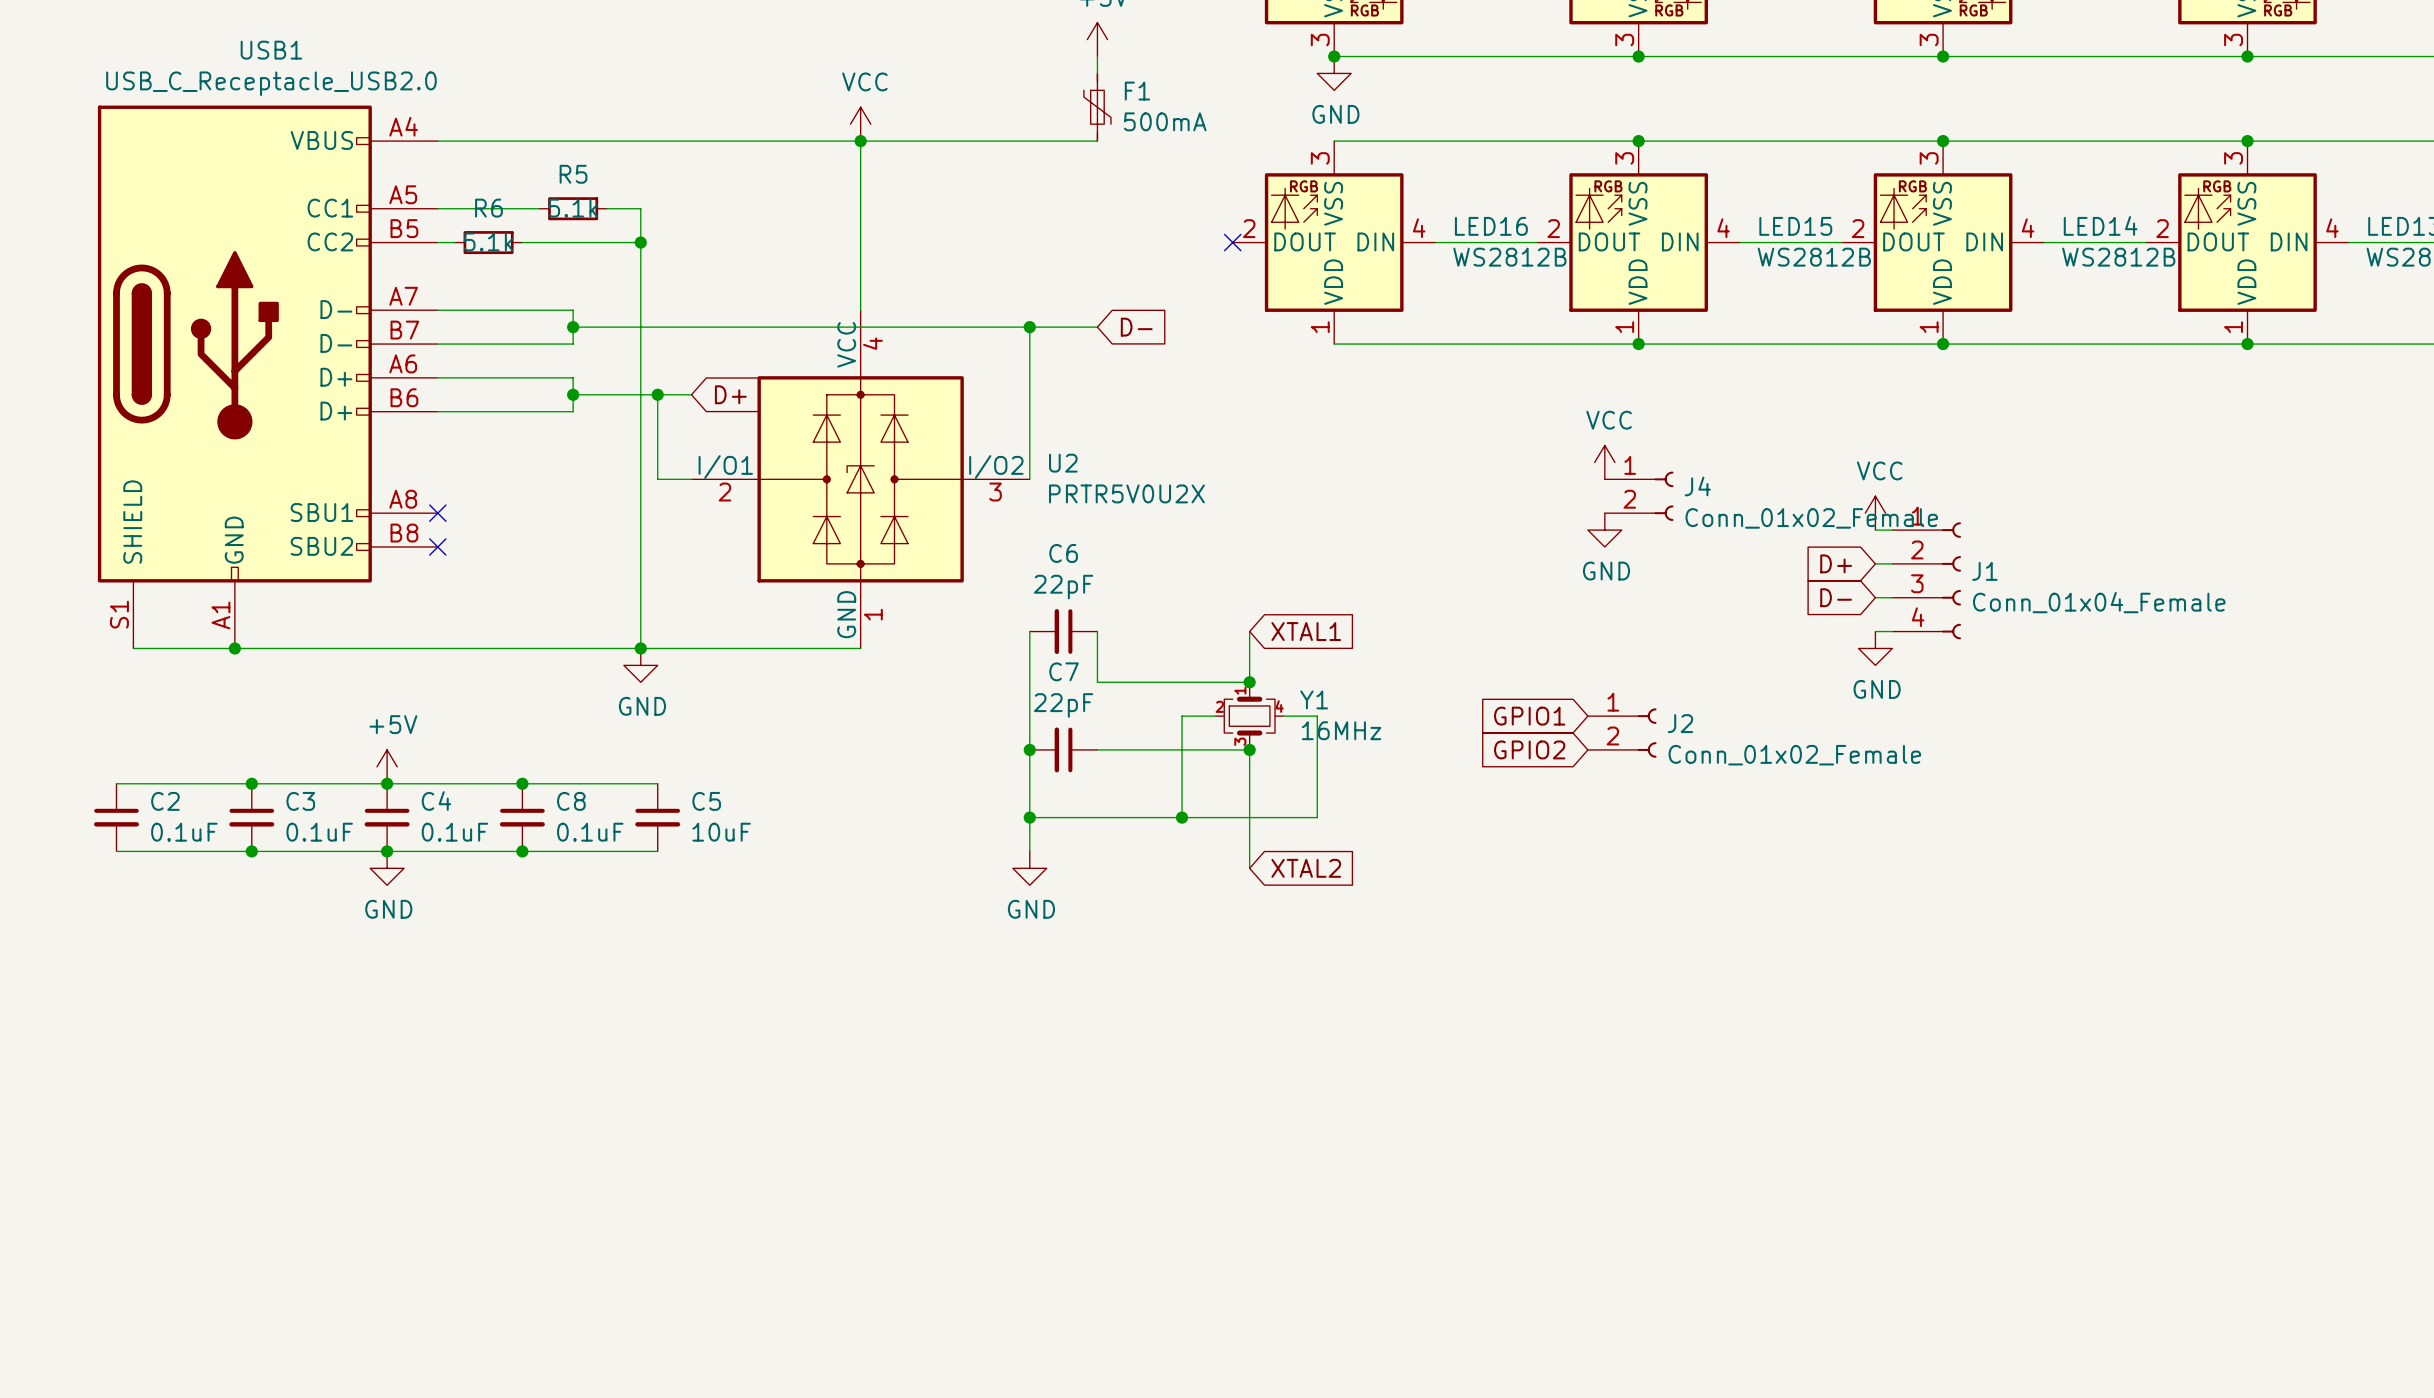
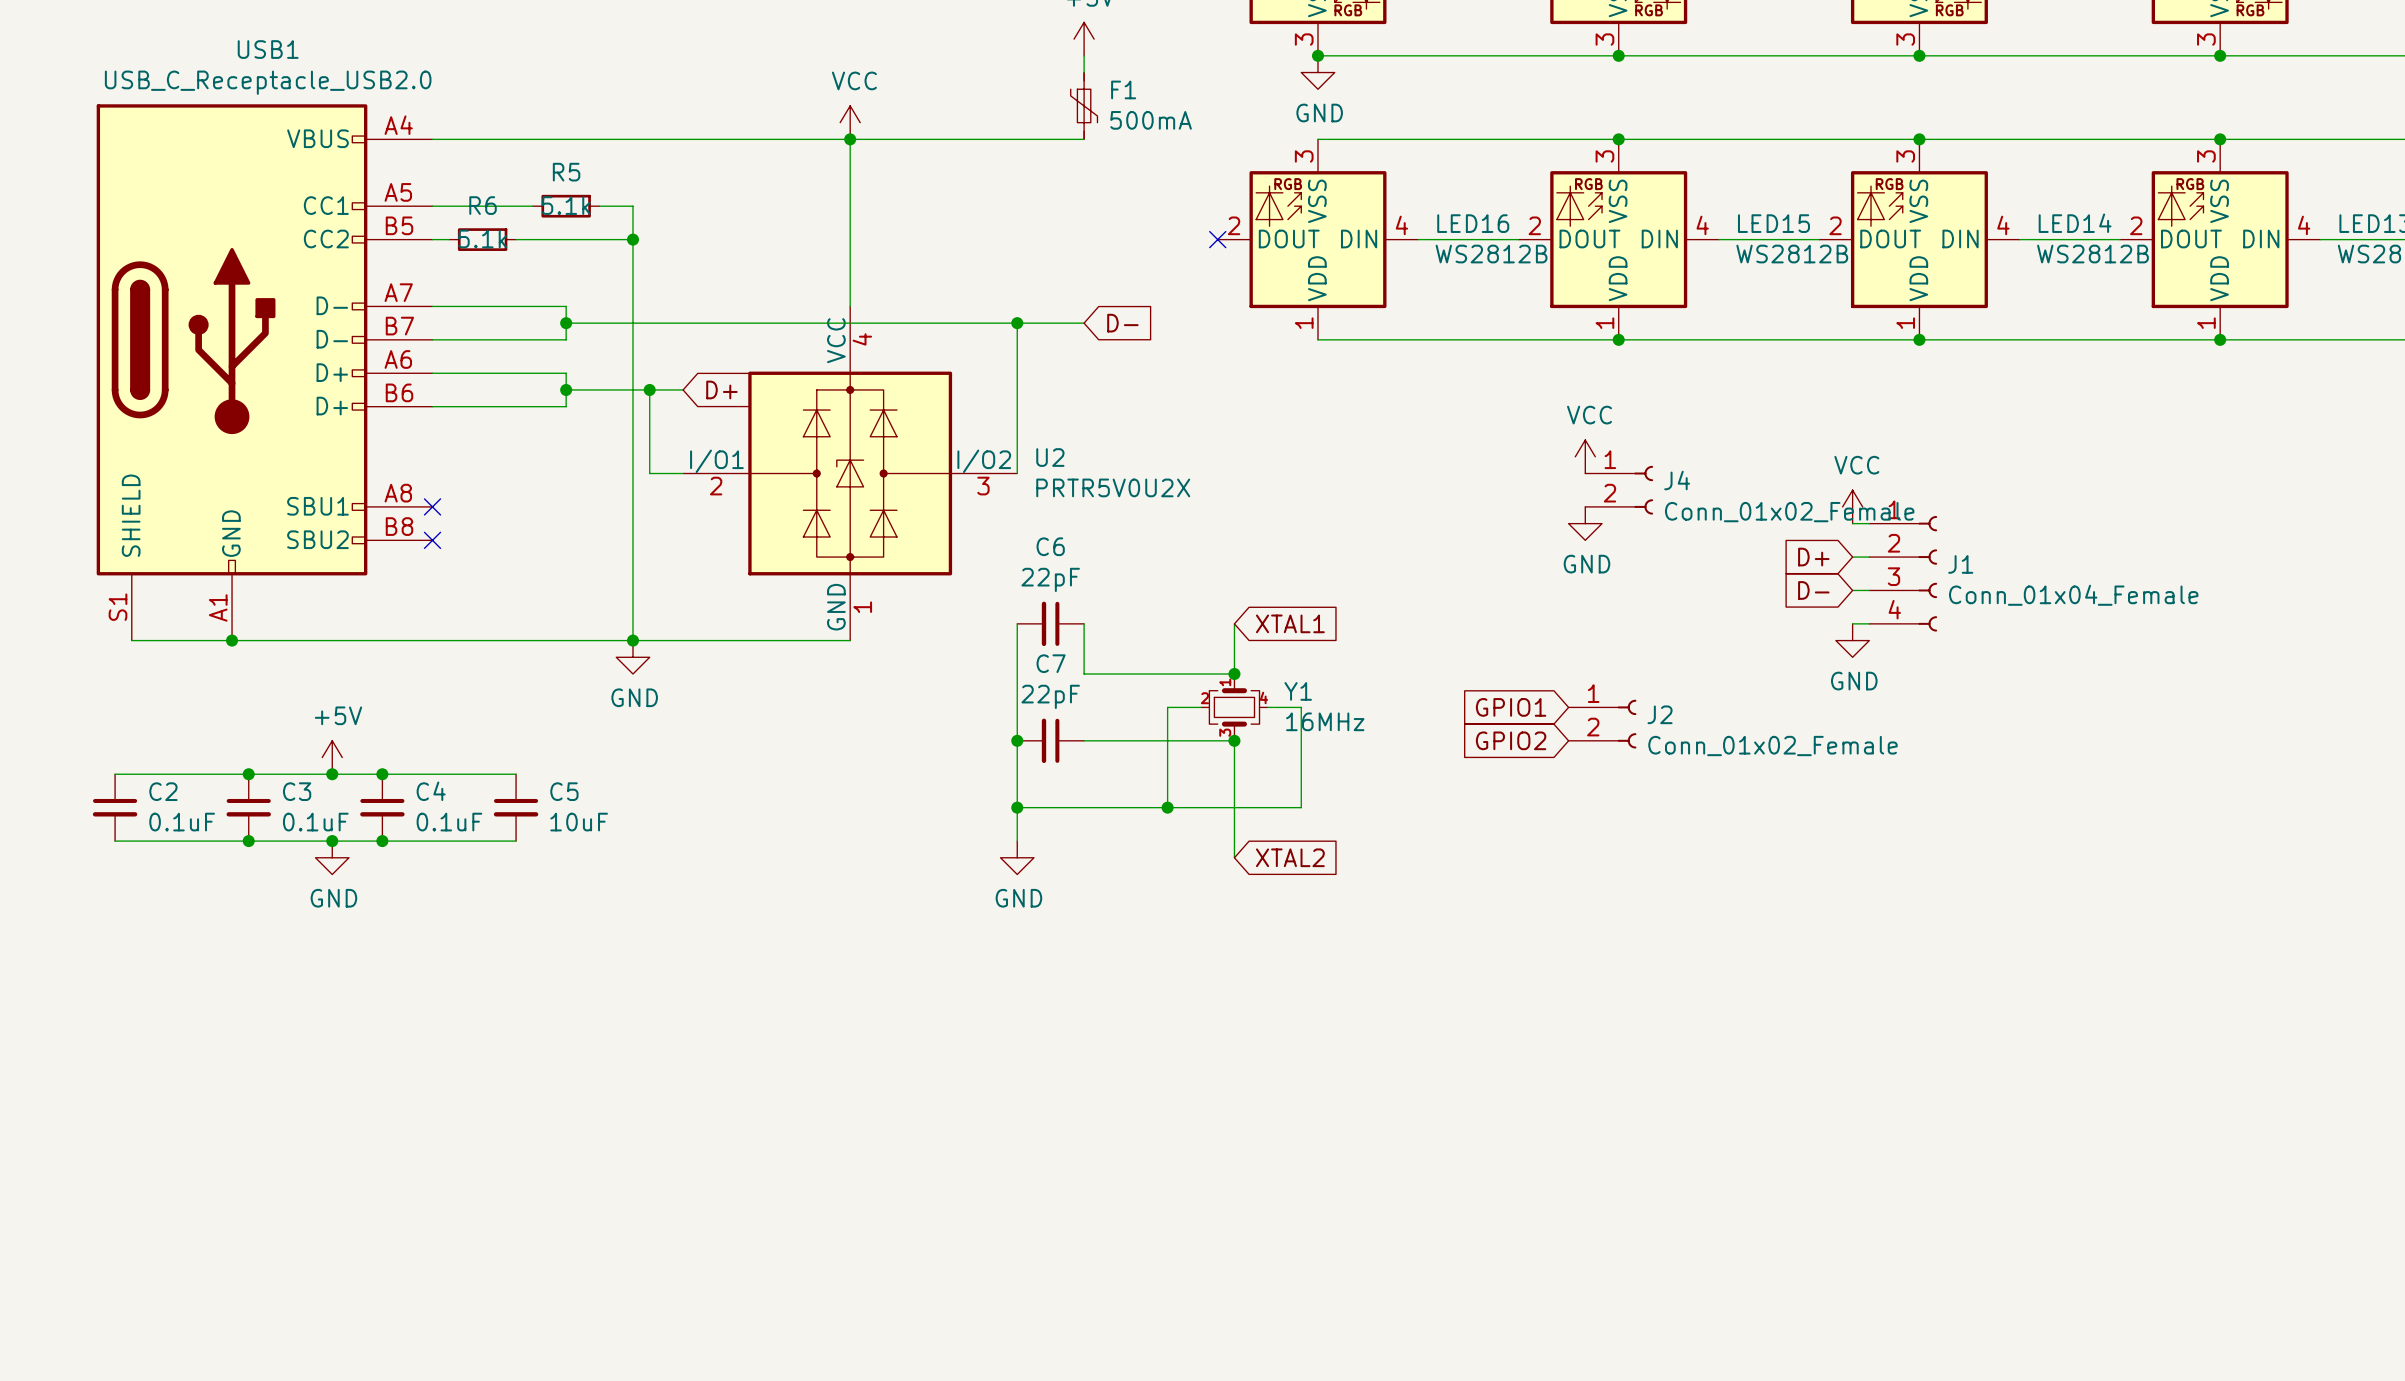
power symbol position: +5V (387, 766) -> +5V (332, 757)
junction: none -> (332, 774)
wire: (522, 783) (657, 783) -> none
junction: (522, 783) -> none
C8 name: C8 (571, 801) -> C5 (564, 791)
C5: 10uF (657, 817) -> none
C8 value: 0.1uF (590, 832) -> 10uF (579, 822)
junction: none -> (332, 841)
wire: (522, 851) (657, 851) -> none
junction: (522, 851) -> none
power symbol position: GND (387, 868) -> GND (332, 857)

